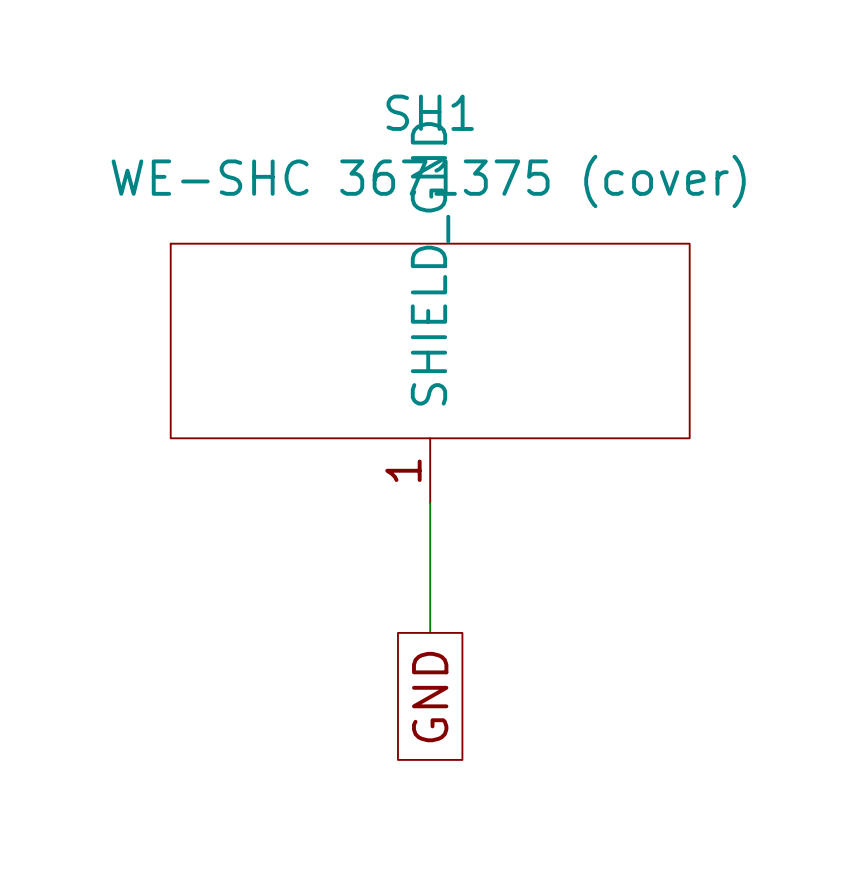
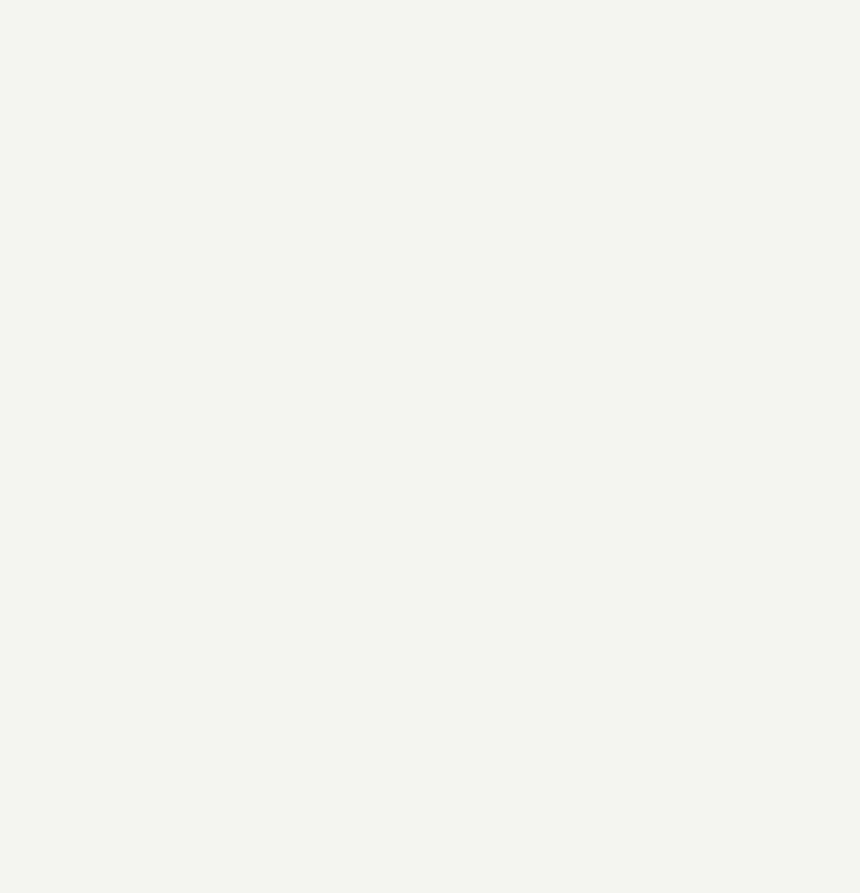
SH1: WE-SHC 3671375 (cover) (430, 373) -> none
wire: (430, 503) (430, 632) -> none
global label: GND (430, 697) -> none

